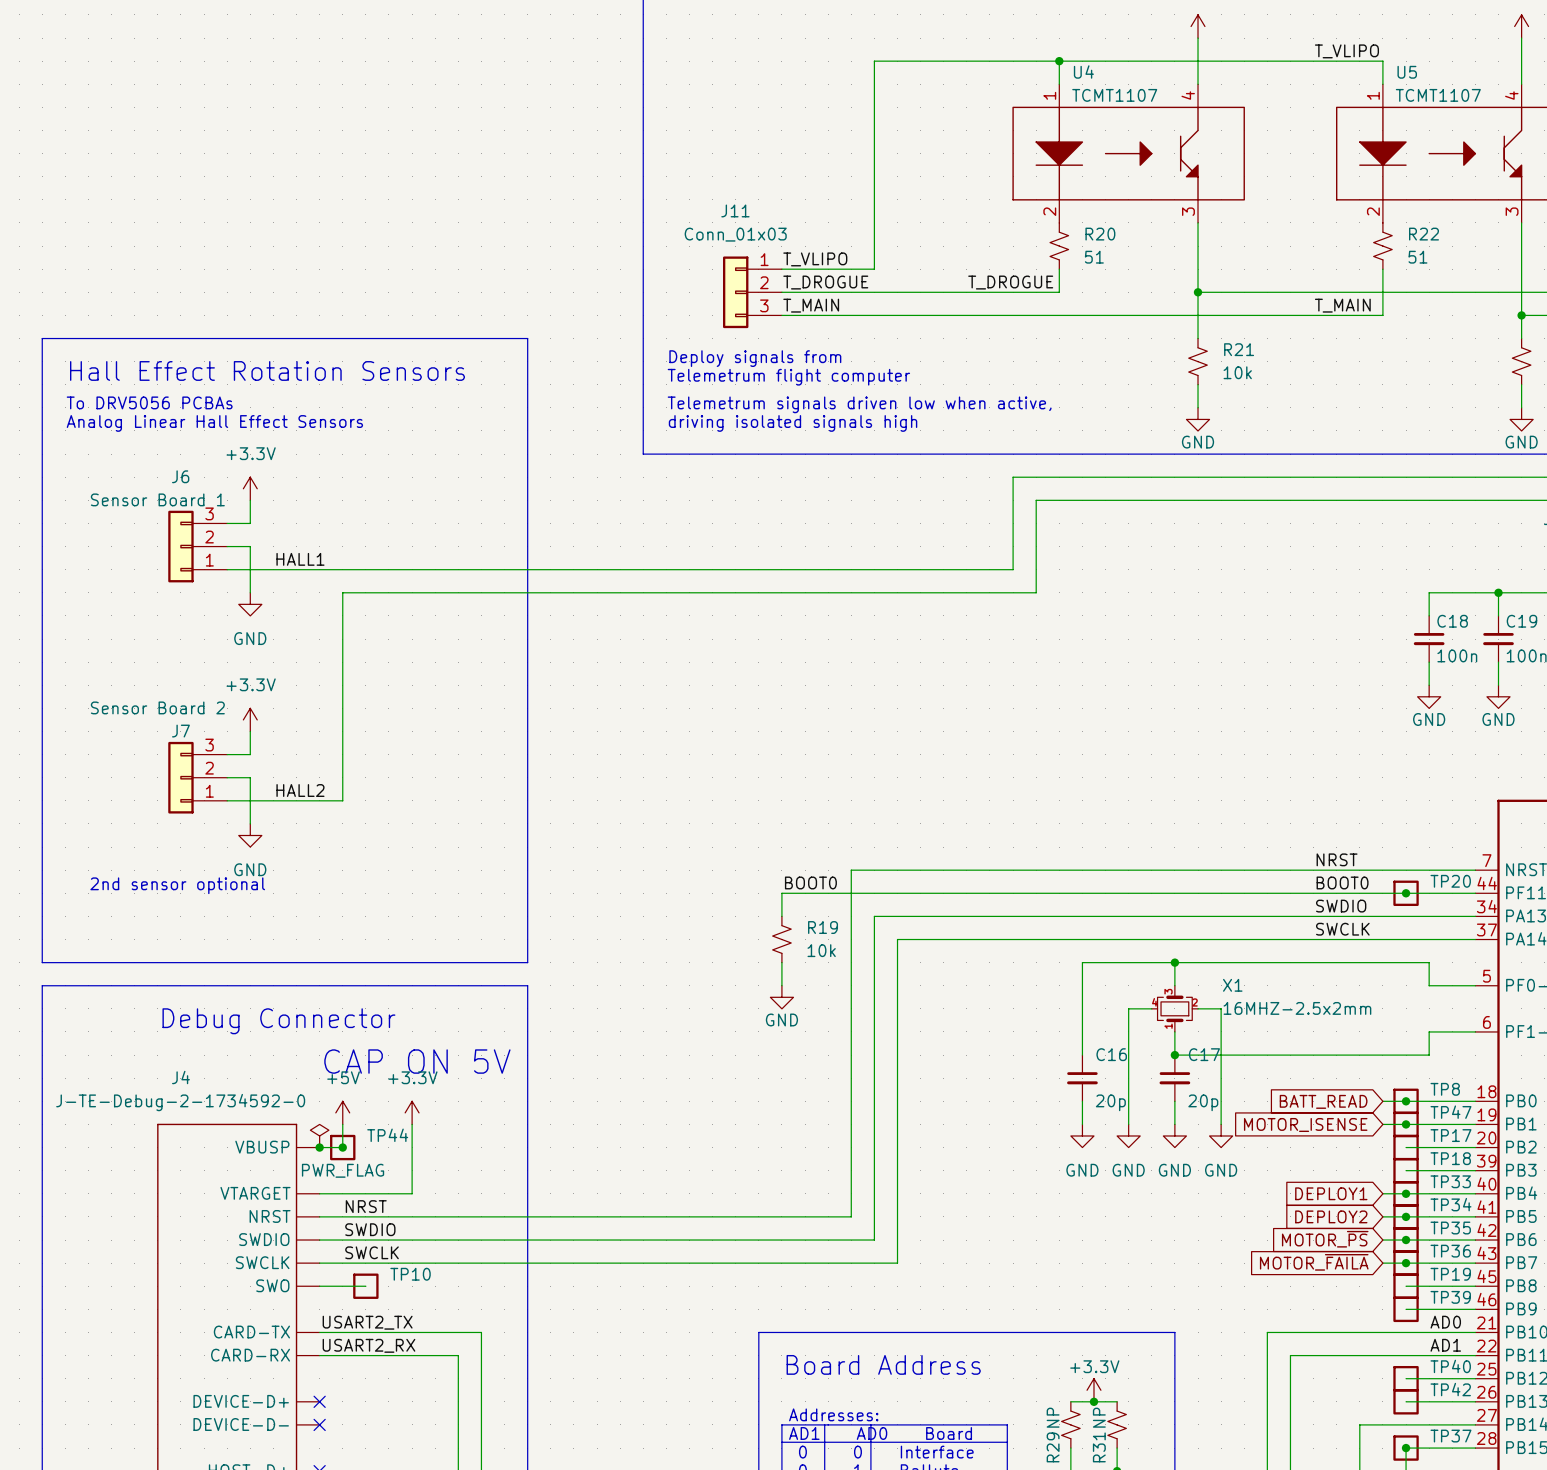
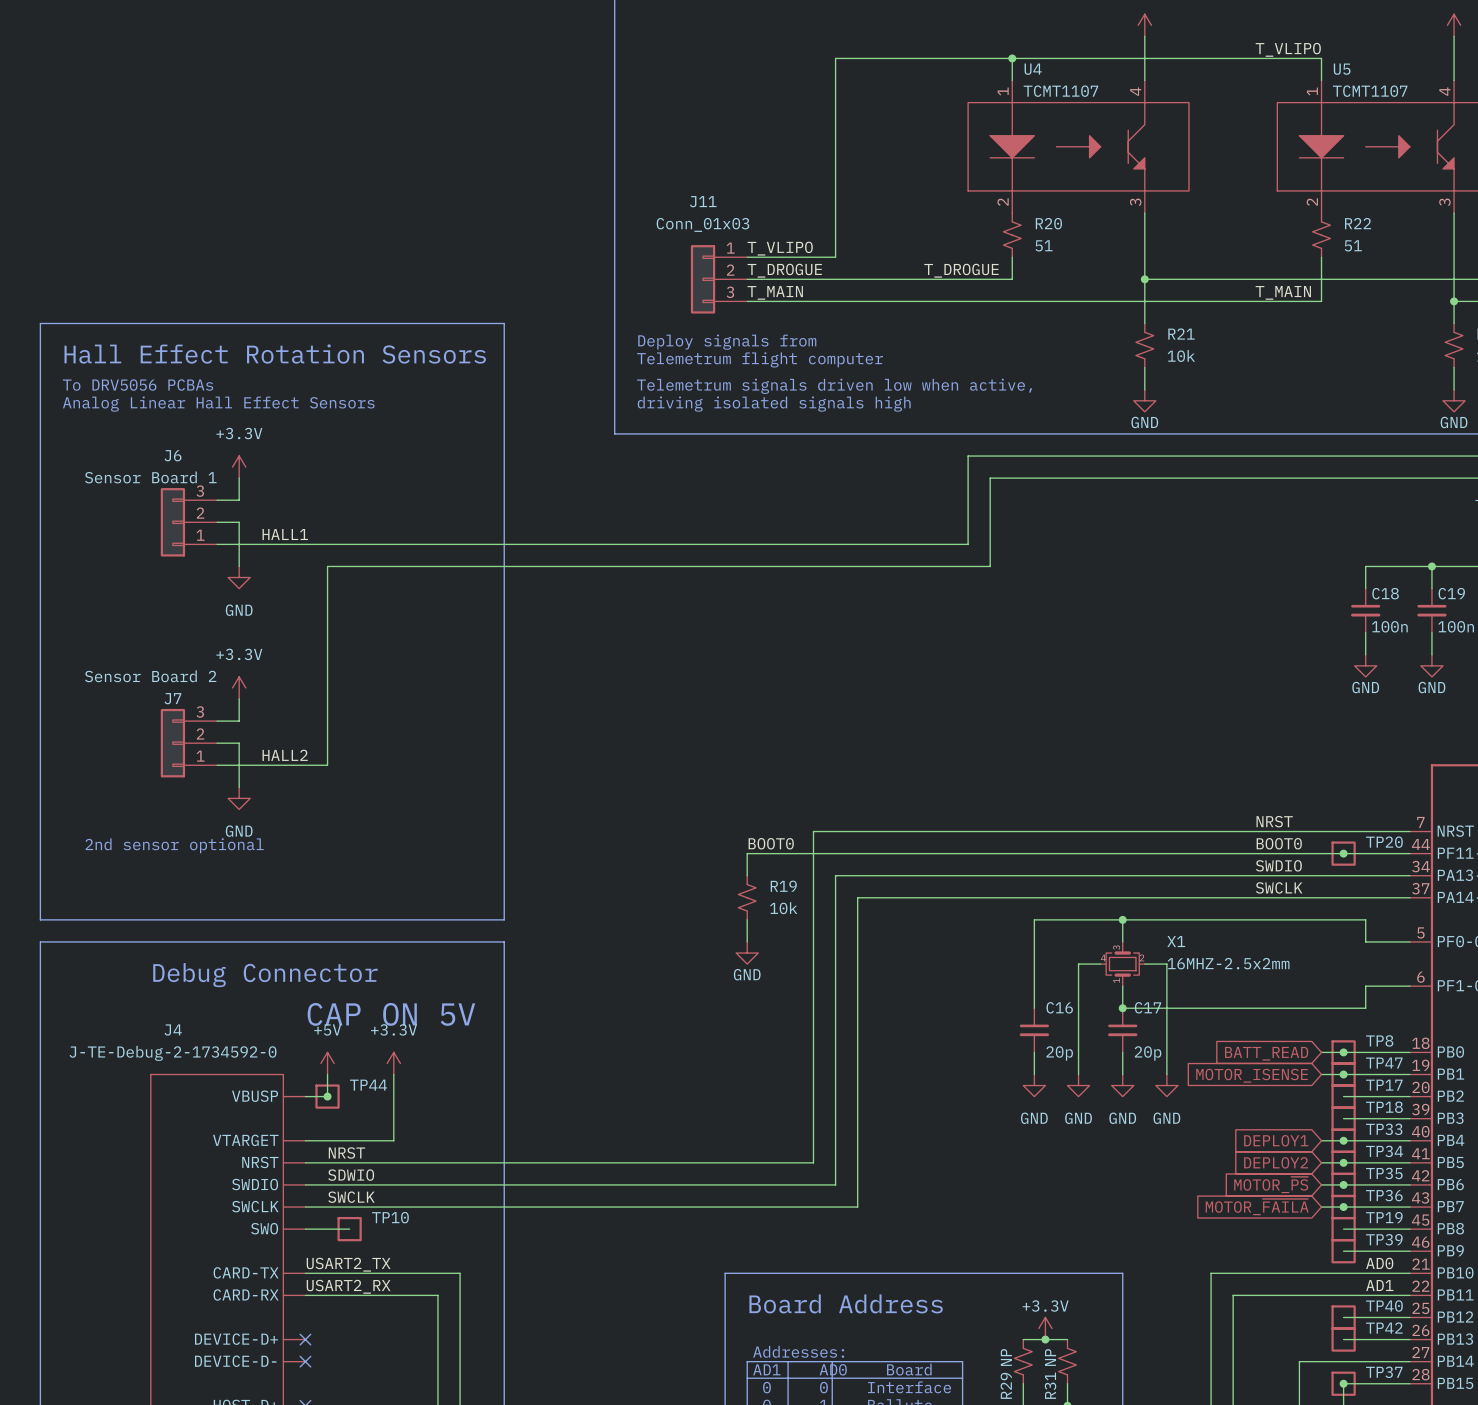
power symbol: PWR_FLAG (319, 1135) -> none
junction: (319, 1147) -> none
label: SWDIO (370, 1229) -> SDWIO (351, 1175)

